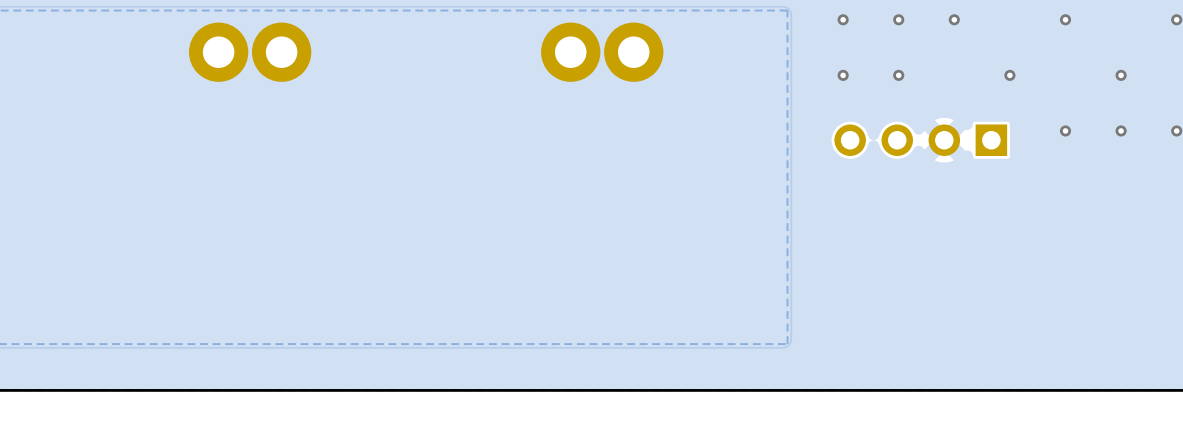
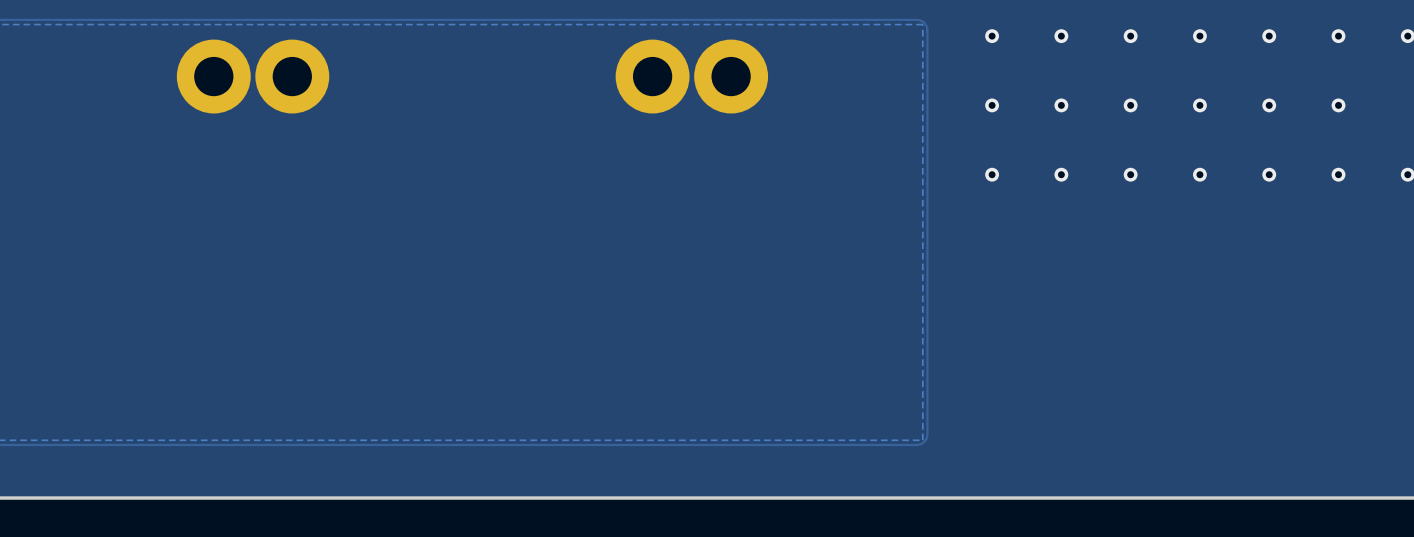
via: none -> (1199, 36)
via: none -> (1338, 36)
via: none -> (1130, 105)
via: none -> (1269, 105)
via: none -> (992, 174)
via: none -> (1061, 174)
via: none -> (1130, 174)
via: none -> (1199, 174)
part: (920, 140) -> none

